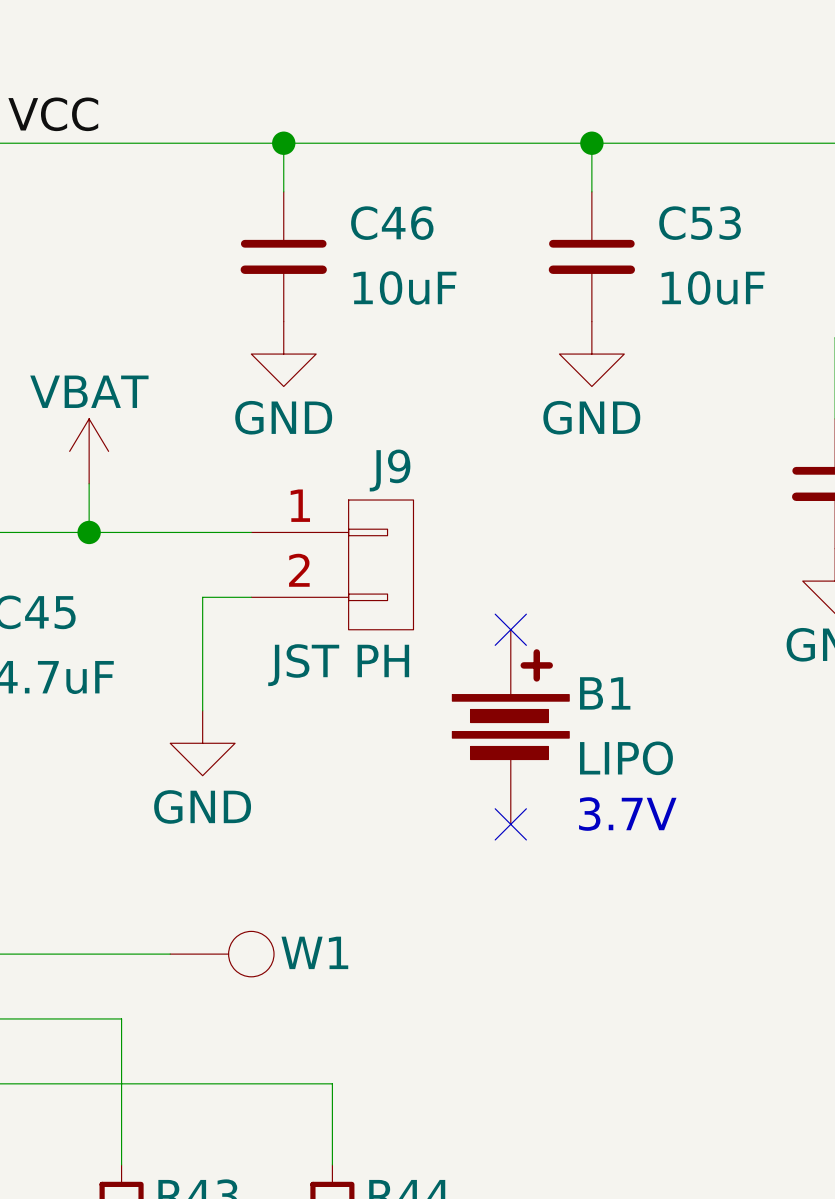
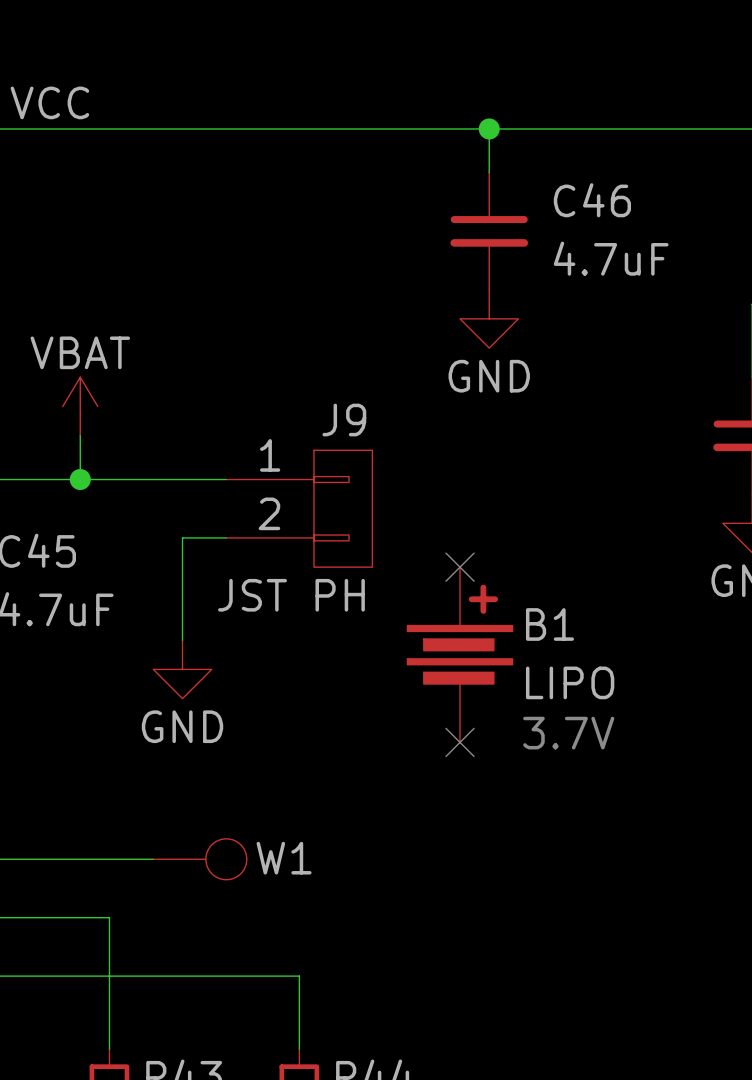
wire: (283, 143) (283, 191) -> none
junction: (283, 143) -> none
wire: (591, 143) (591, 191) -> (489, 128) (489, 172)
junction position: (591, 143) -> (489, 128)
C46 position: (283, 256) -> (489, 231)
C53: 10uF (591, 256) -> none
C46 value: 10uF (404, 287) -> 4.7uF (611, 258)
power symbol: GND (283, 354) -> none
power symbol position: GND (591, 354) -> GND (489, 318)

